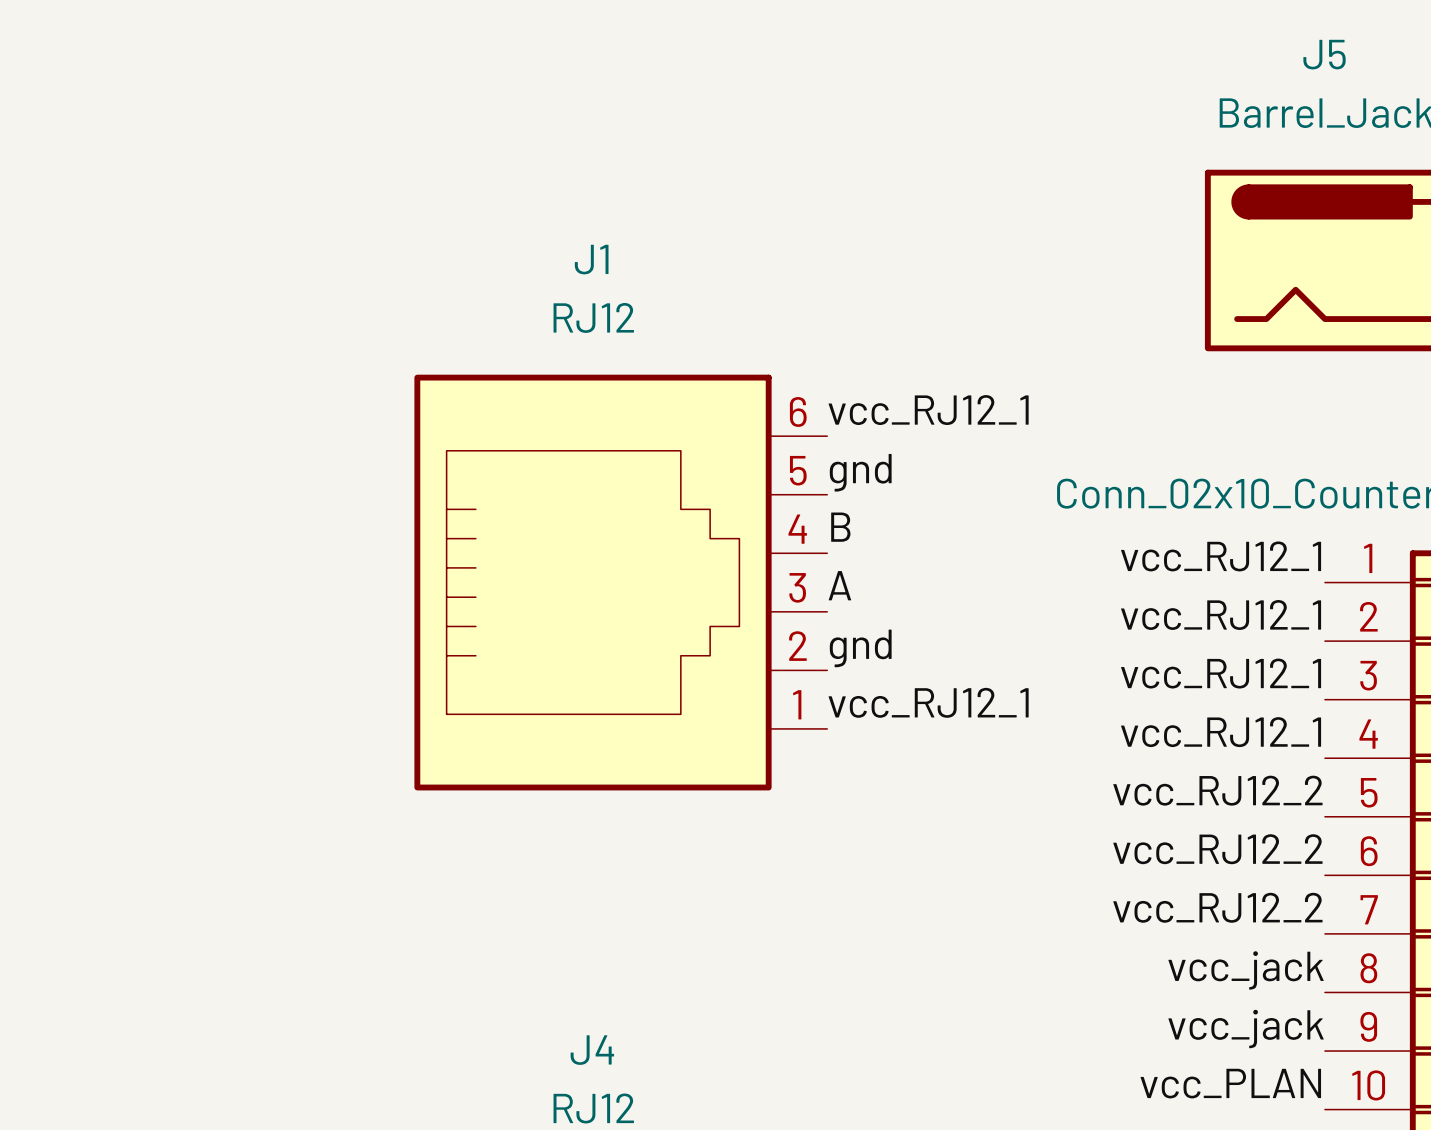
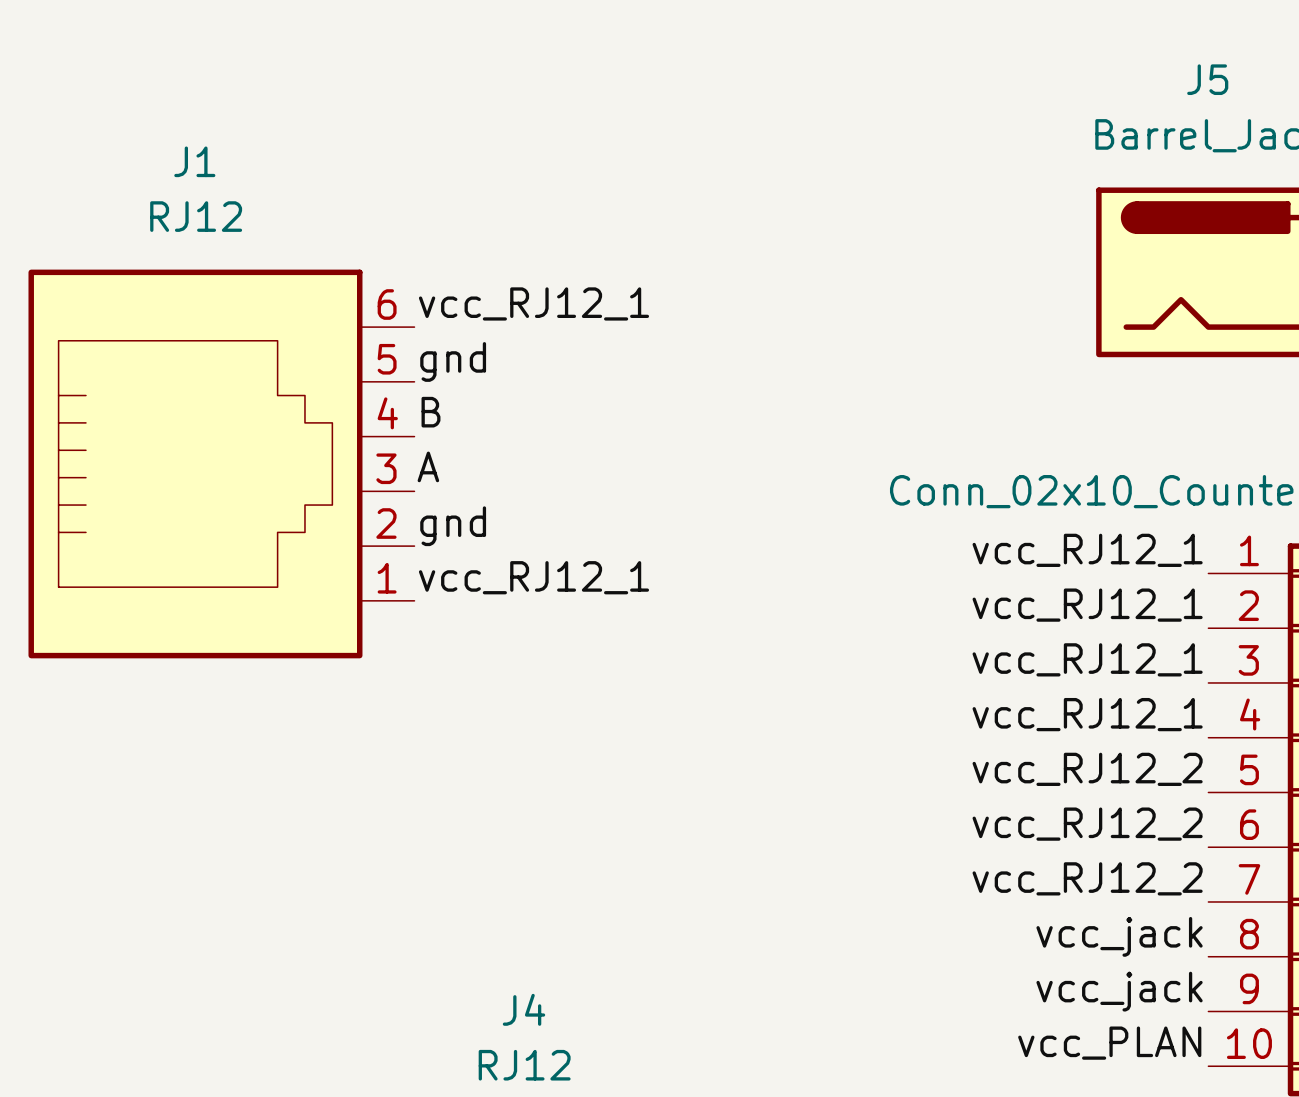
label: none -> vcc_RJ12_1 (533, 303)
label: none -> gnd (453, 361)
label: vcc_RJ12_1 (928, 410) -> none
label: gnd (860, 472) -> none
label position: B (840, 527) -> B (430, 412)
label: none -> gnd (453, 526)
J1 position: (620, 582) -> (221, 463)
label: none -> vcc_RJ12_1 (533, 577)
label position: A (839, 585) -> A (428, 466)
label: gnd (860, 648) -> none
label: vcc_RJ12_1 (928, 702) -> none

